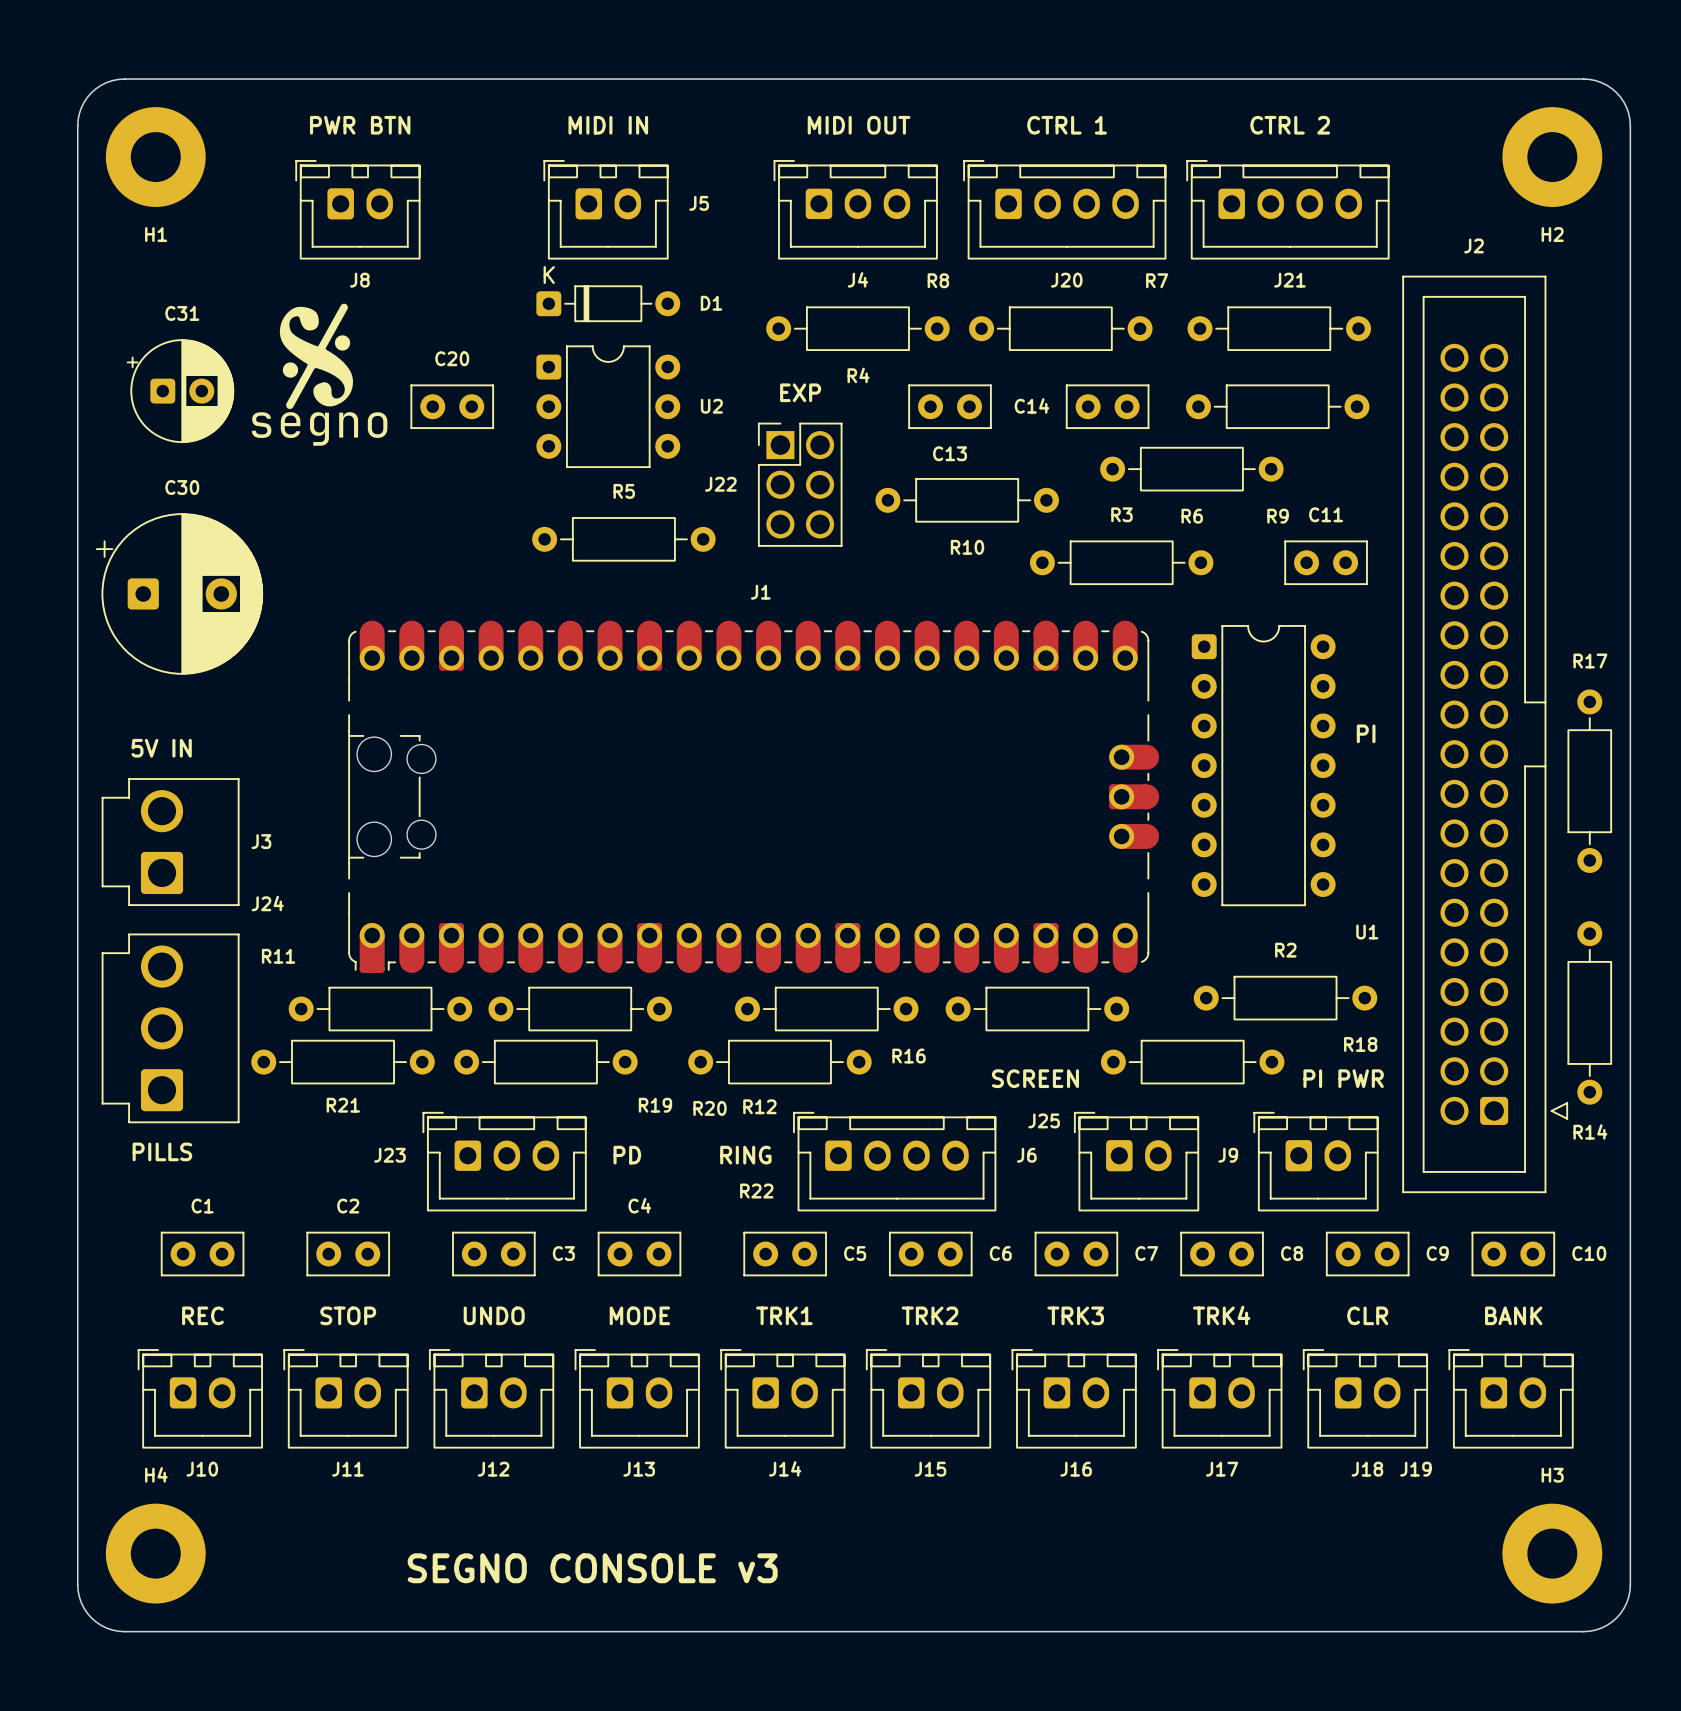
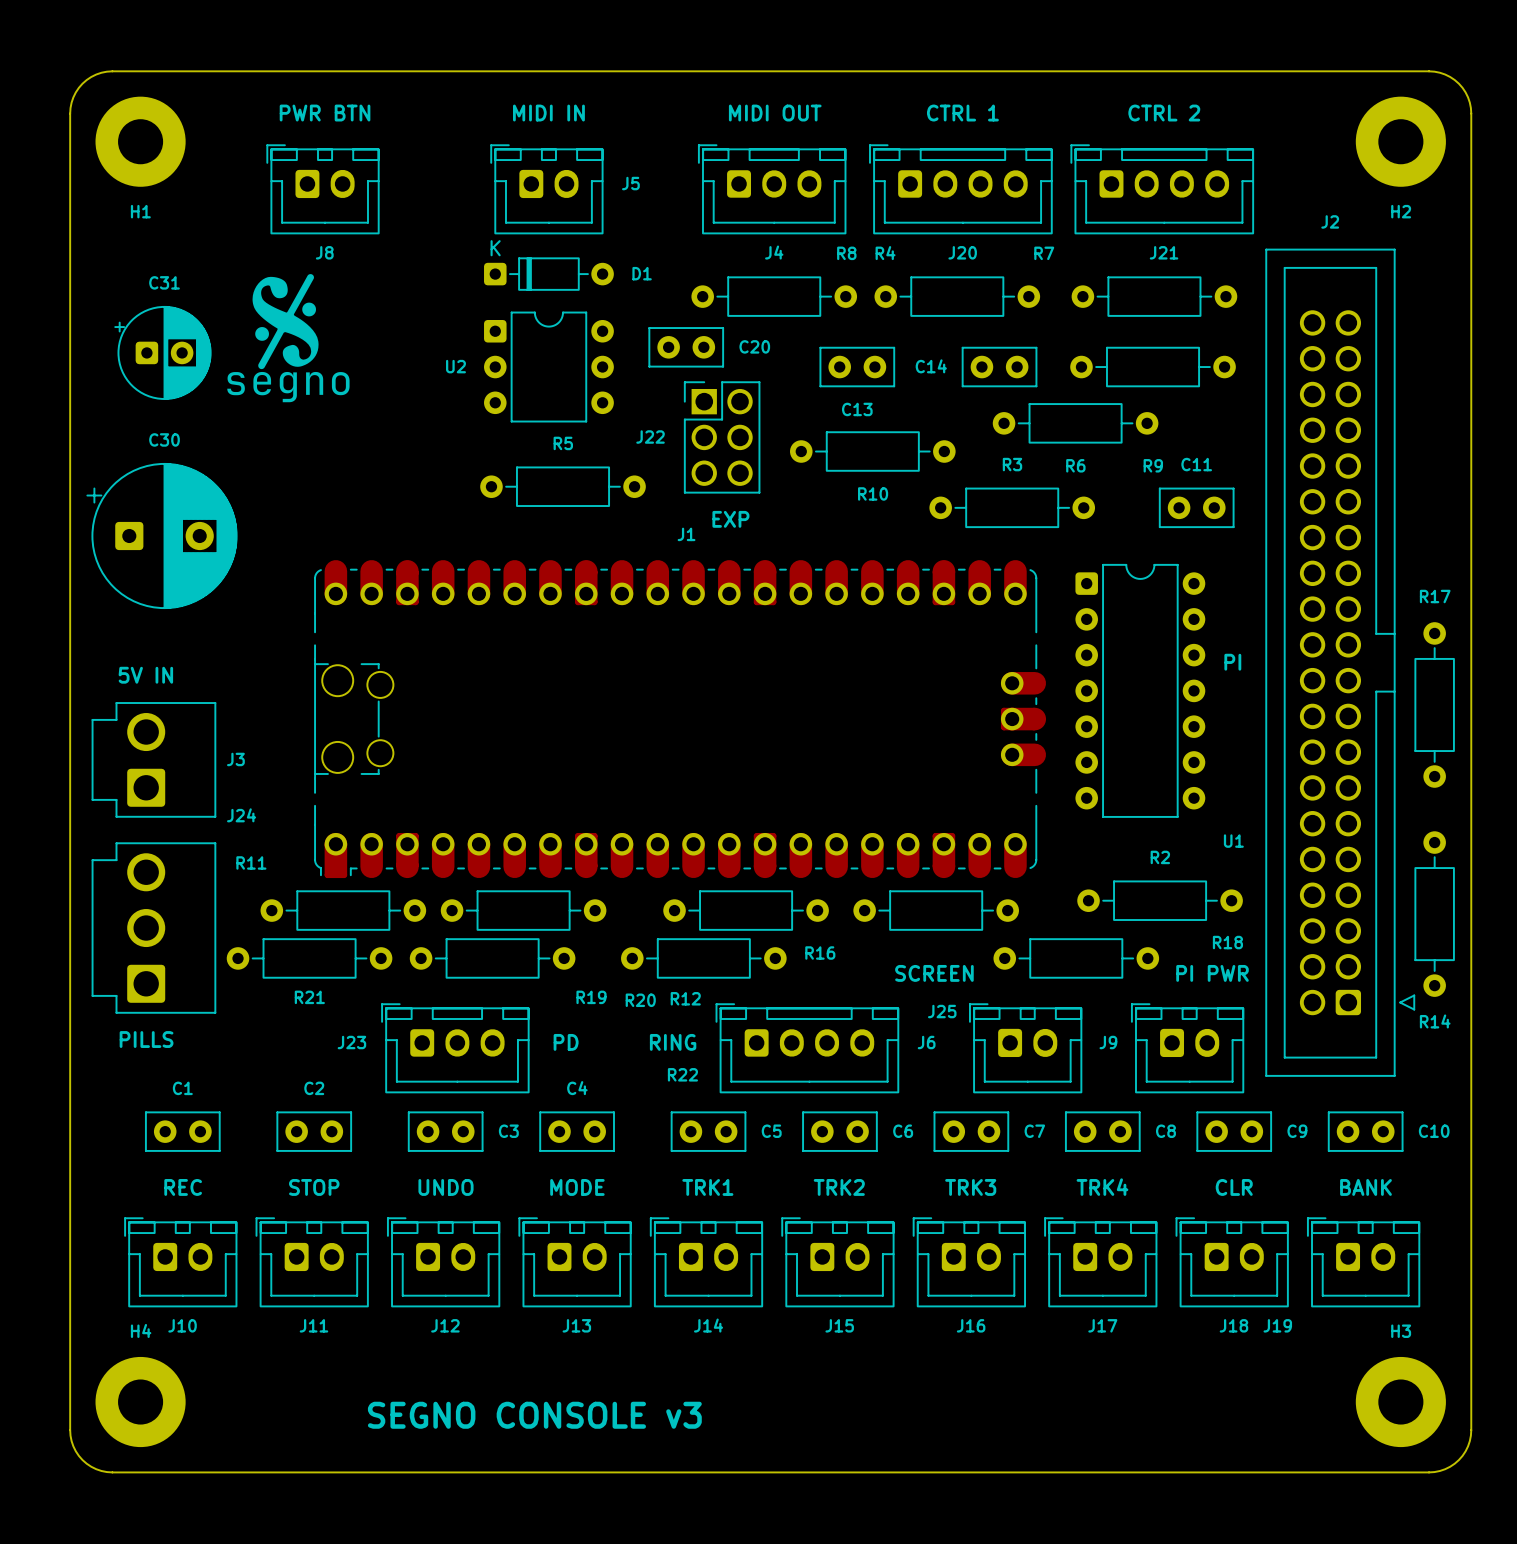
C20 name position: C20 (452, 358) -> C20 (754, 346)
R4 name position: R4 (858, 375) -> R4 (885, 253)
text position: EXP (800, 392) -> EXP (730, 519)
C20 position: (452, 406) -> (686, 347)
U2 name position: U2 (711, 406) -> U2 (455, 366)

